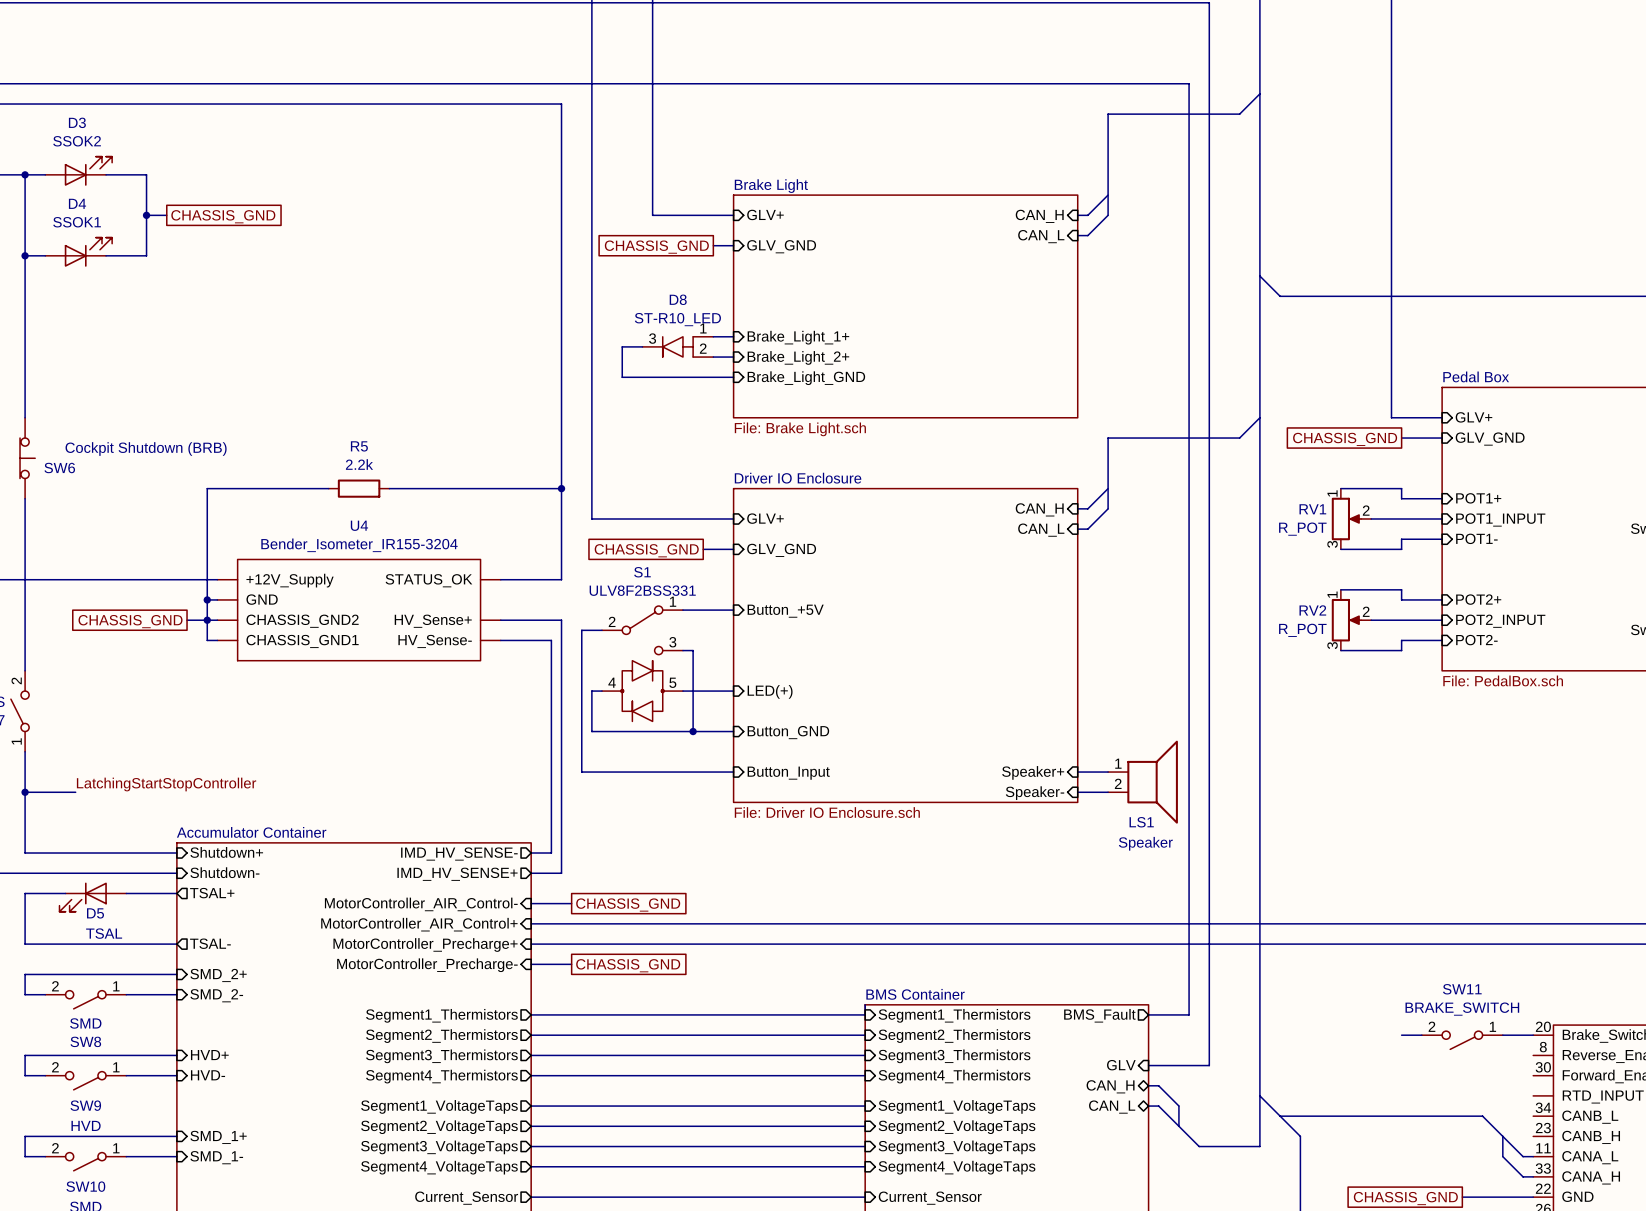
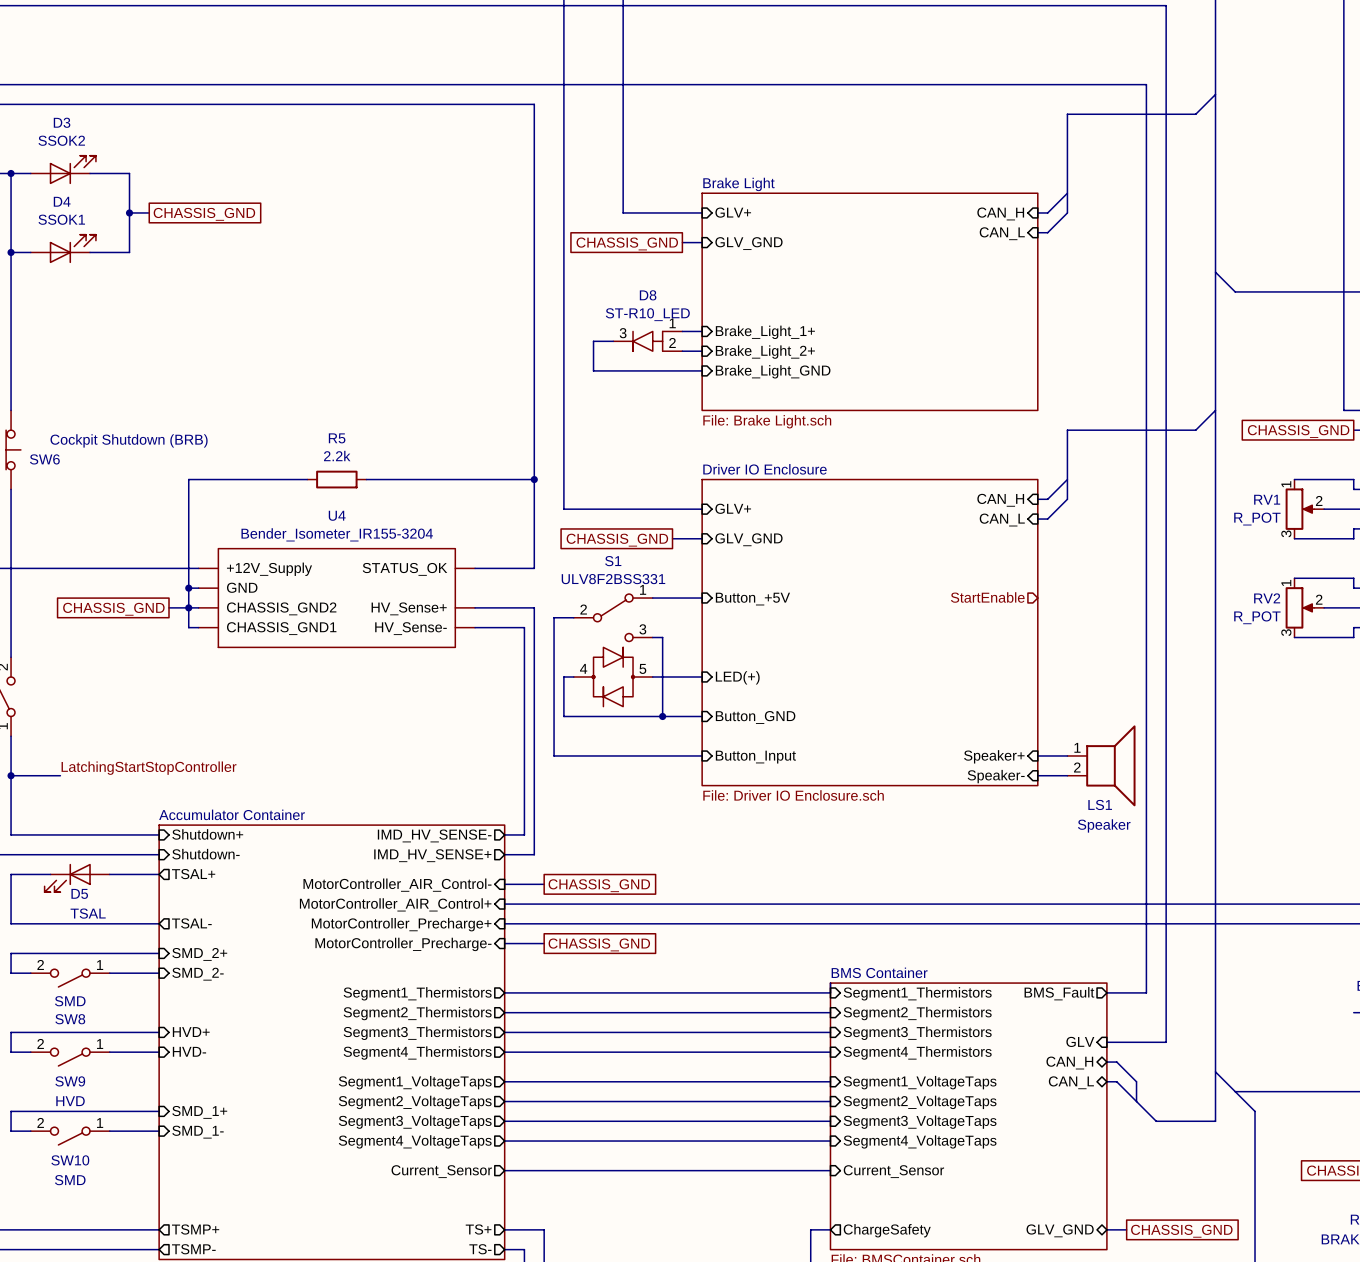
hierarchical label: none -> StartEnable (987, 597)

